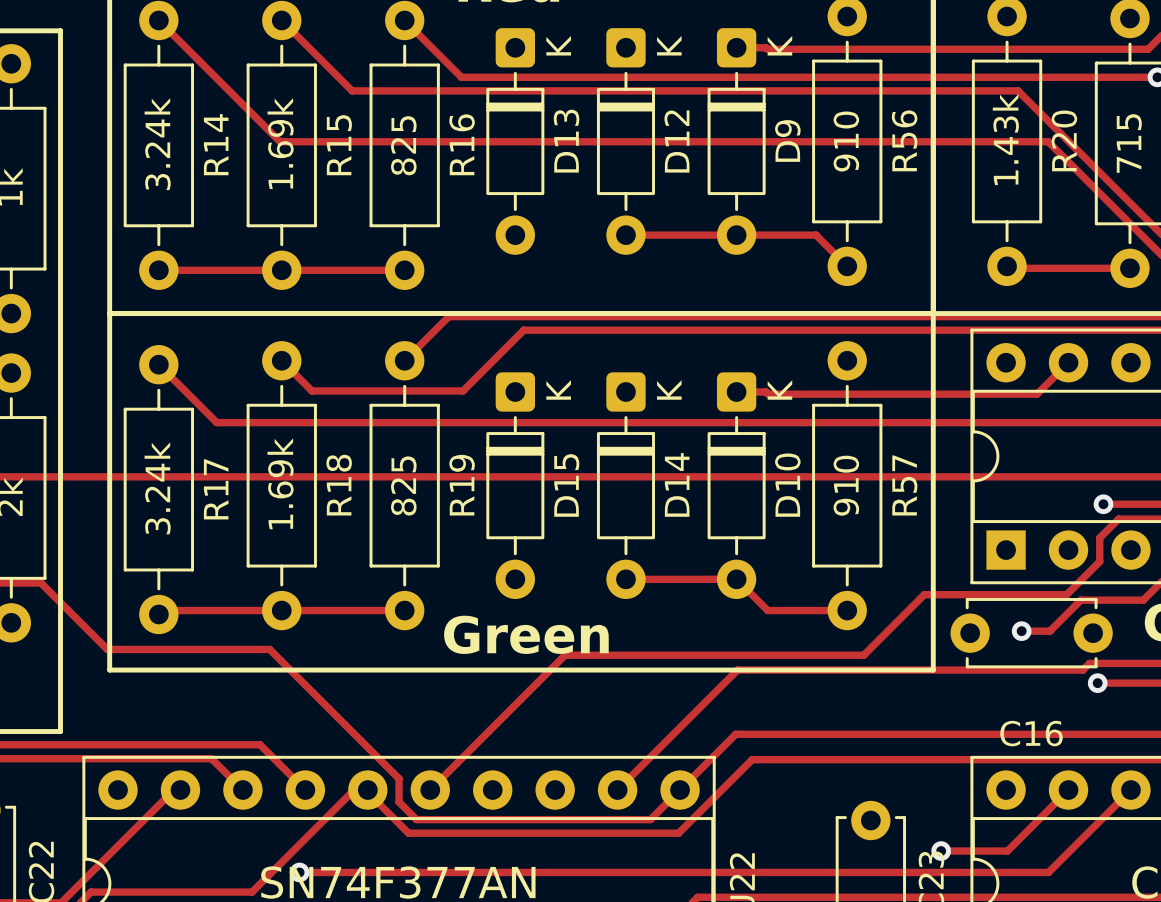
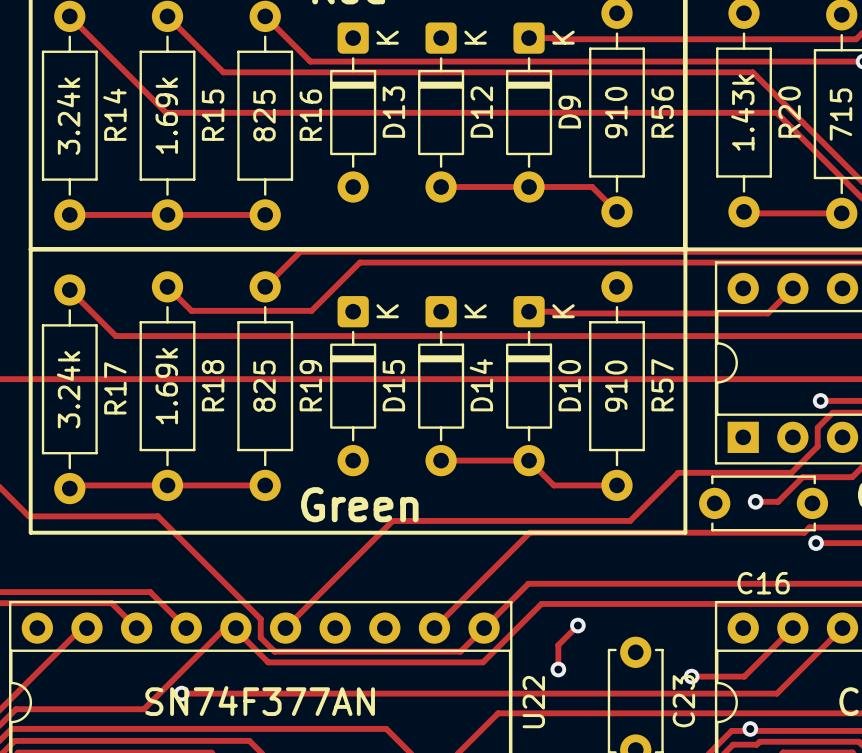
track: none -> (577, 625) (558, 645) (558, 669)
via: none -> (577, 625)
via: none -> (558, 669)

